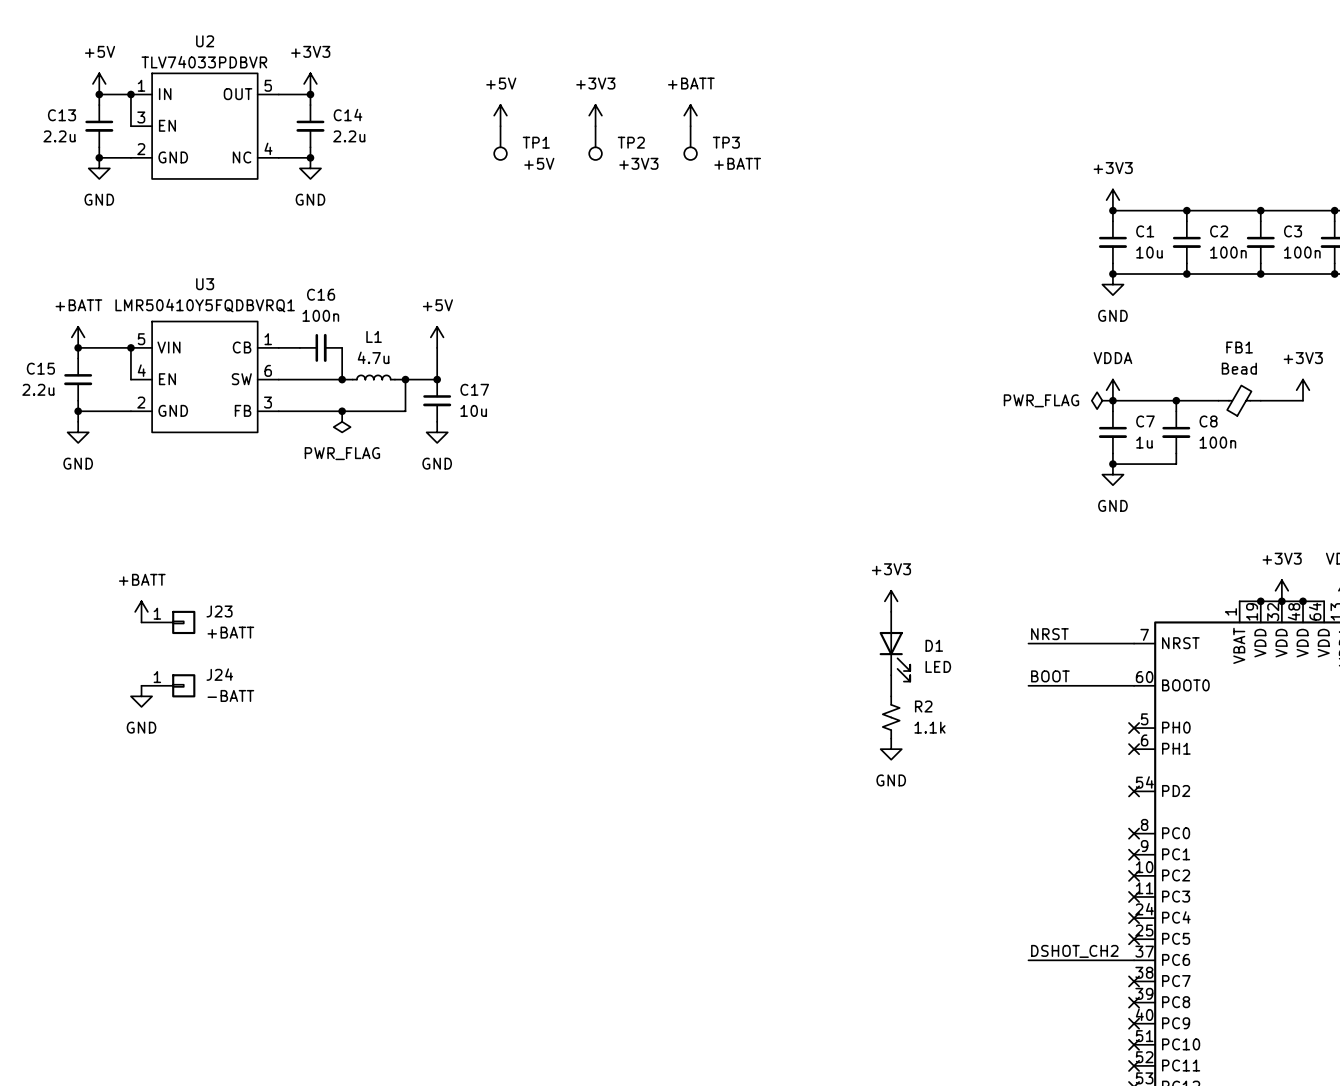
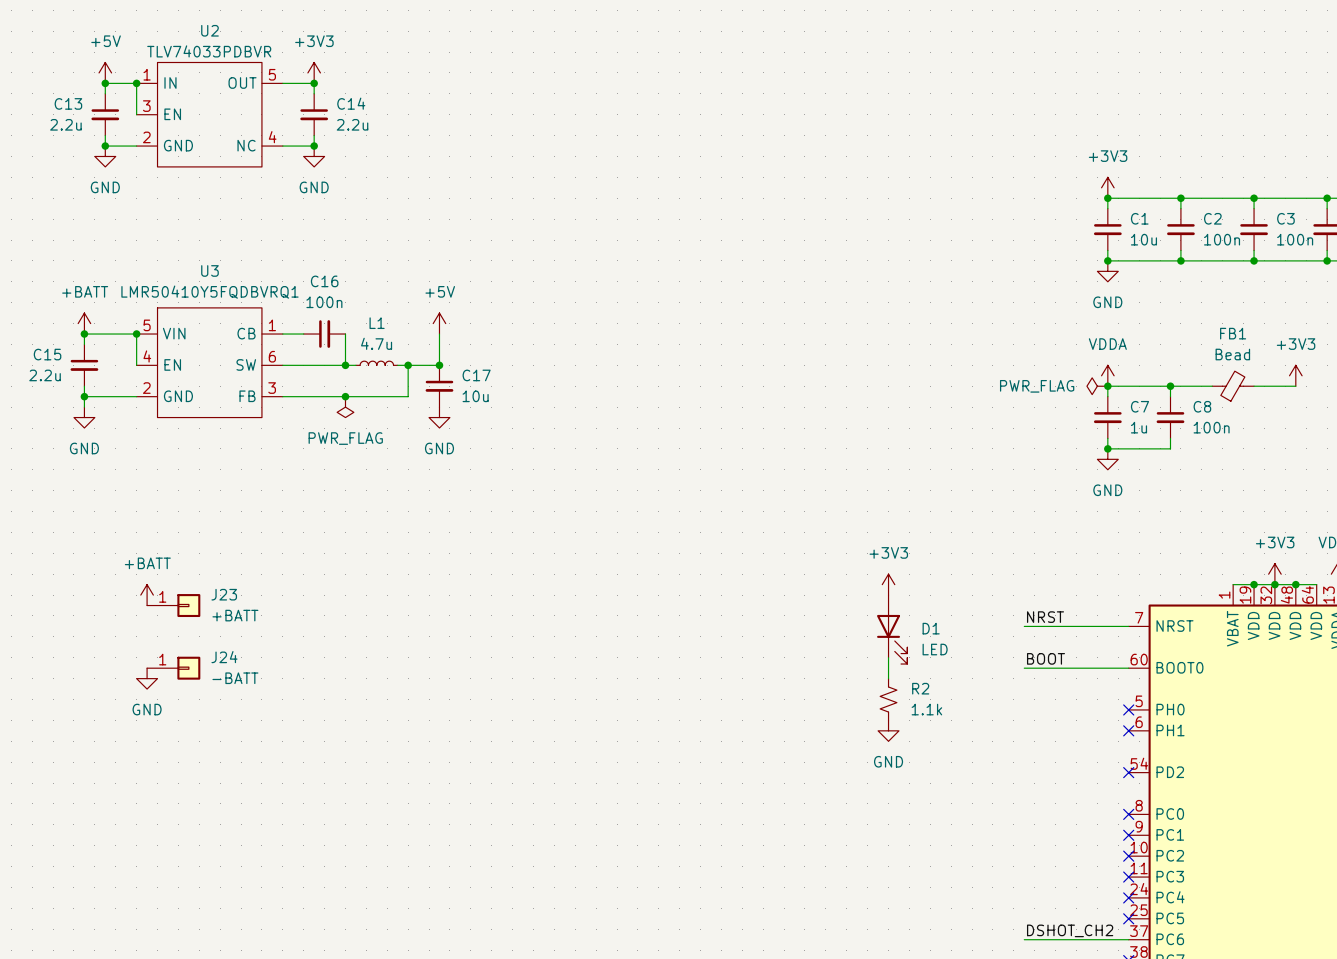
power symbol: +5V (500, 115) -> none
power symbol: +3V3 (595, 115) -> none
power symbol: +BATT (690, 115) -> none
TP1: +5V (500, 143) -> none
TP2: +3V3 (595, 143) -> none
TP3: +BATT (690, 143) -> none

